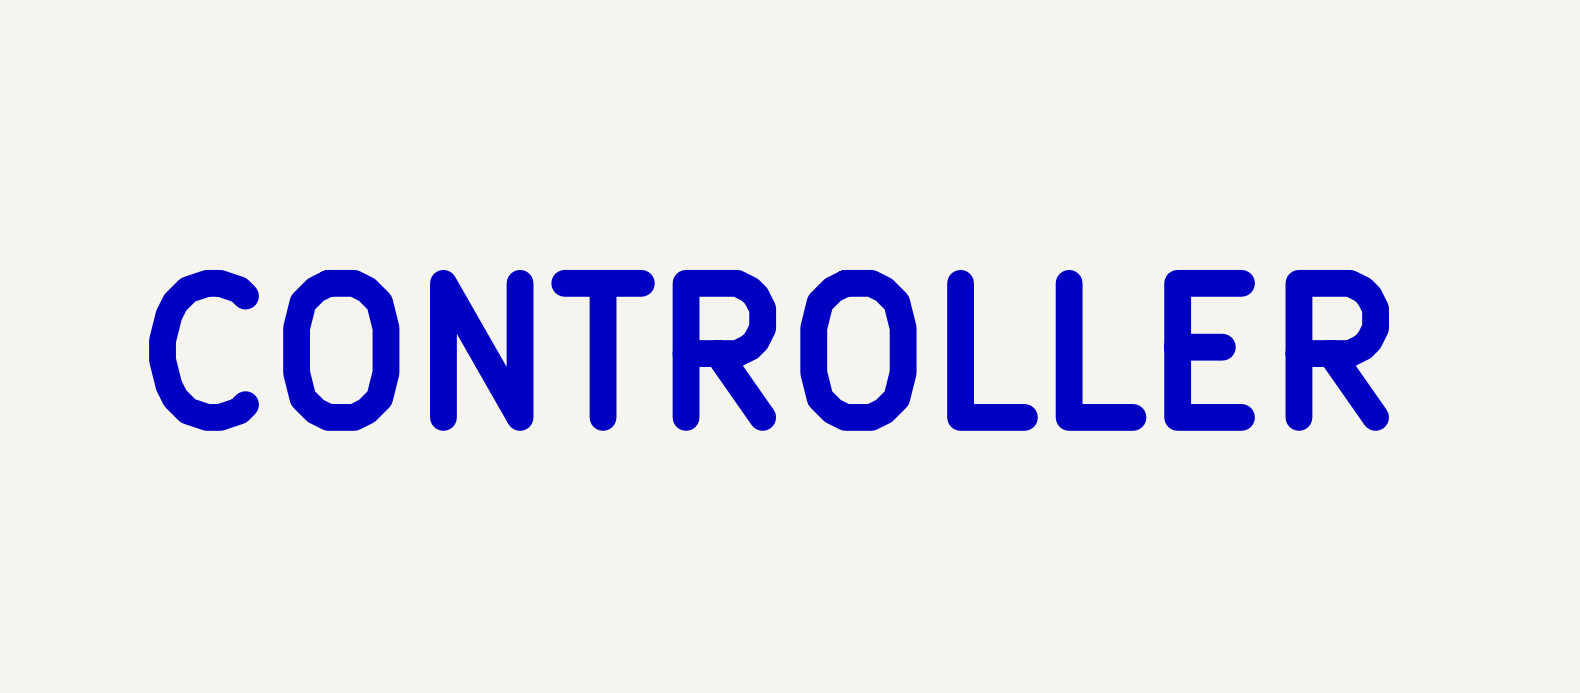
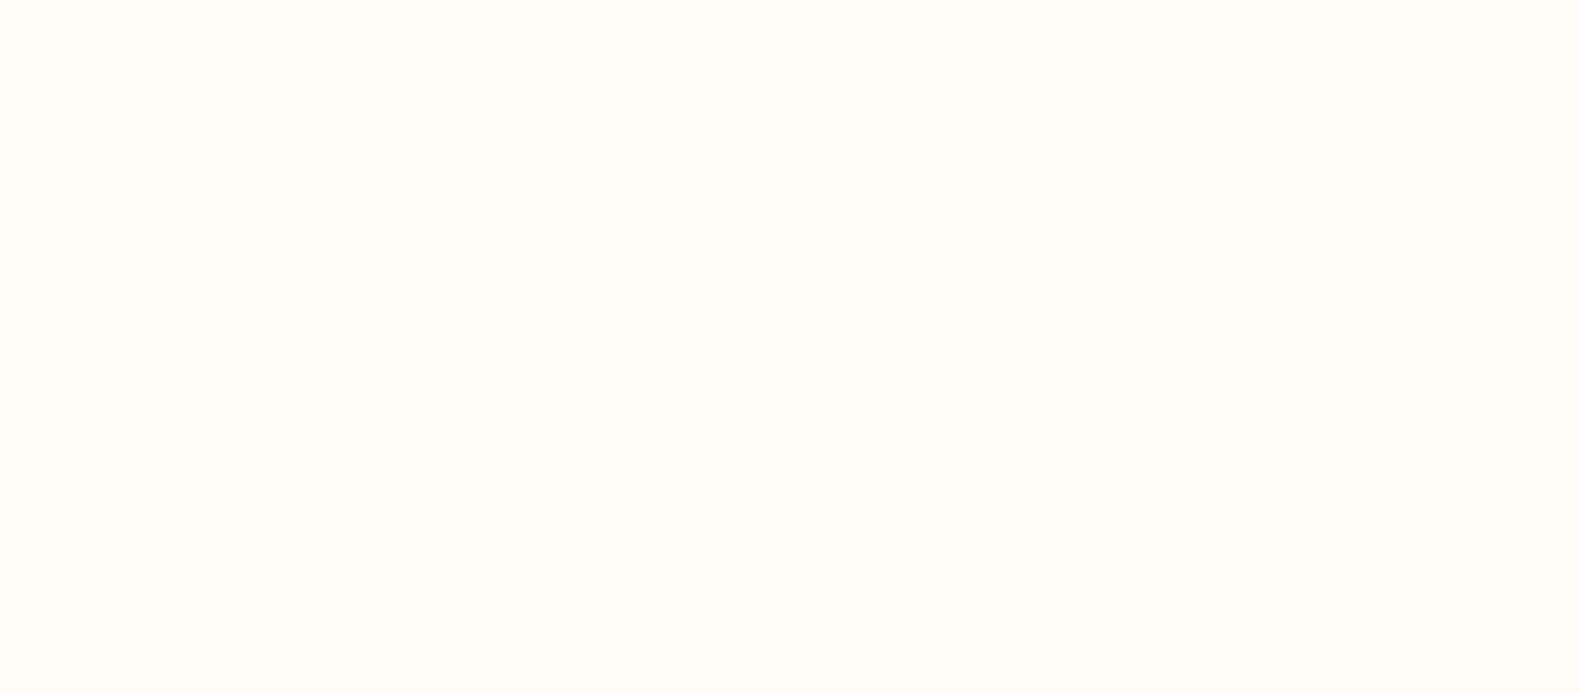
text: CONTROLLER (769, 350) -> none

